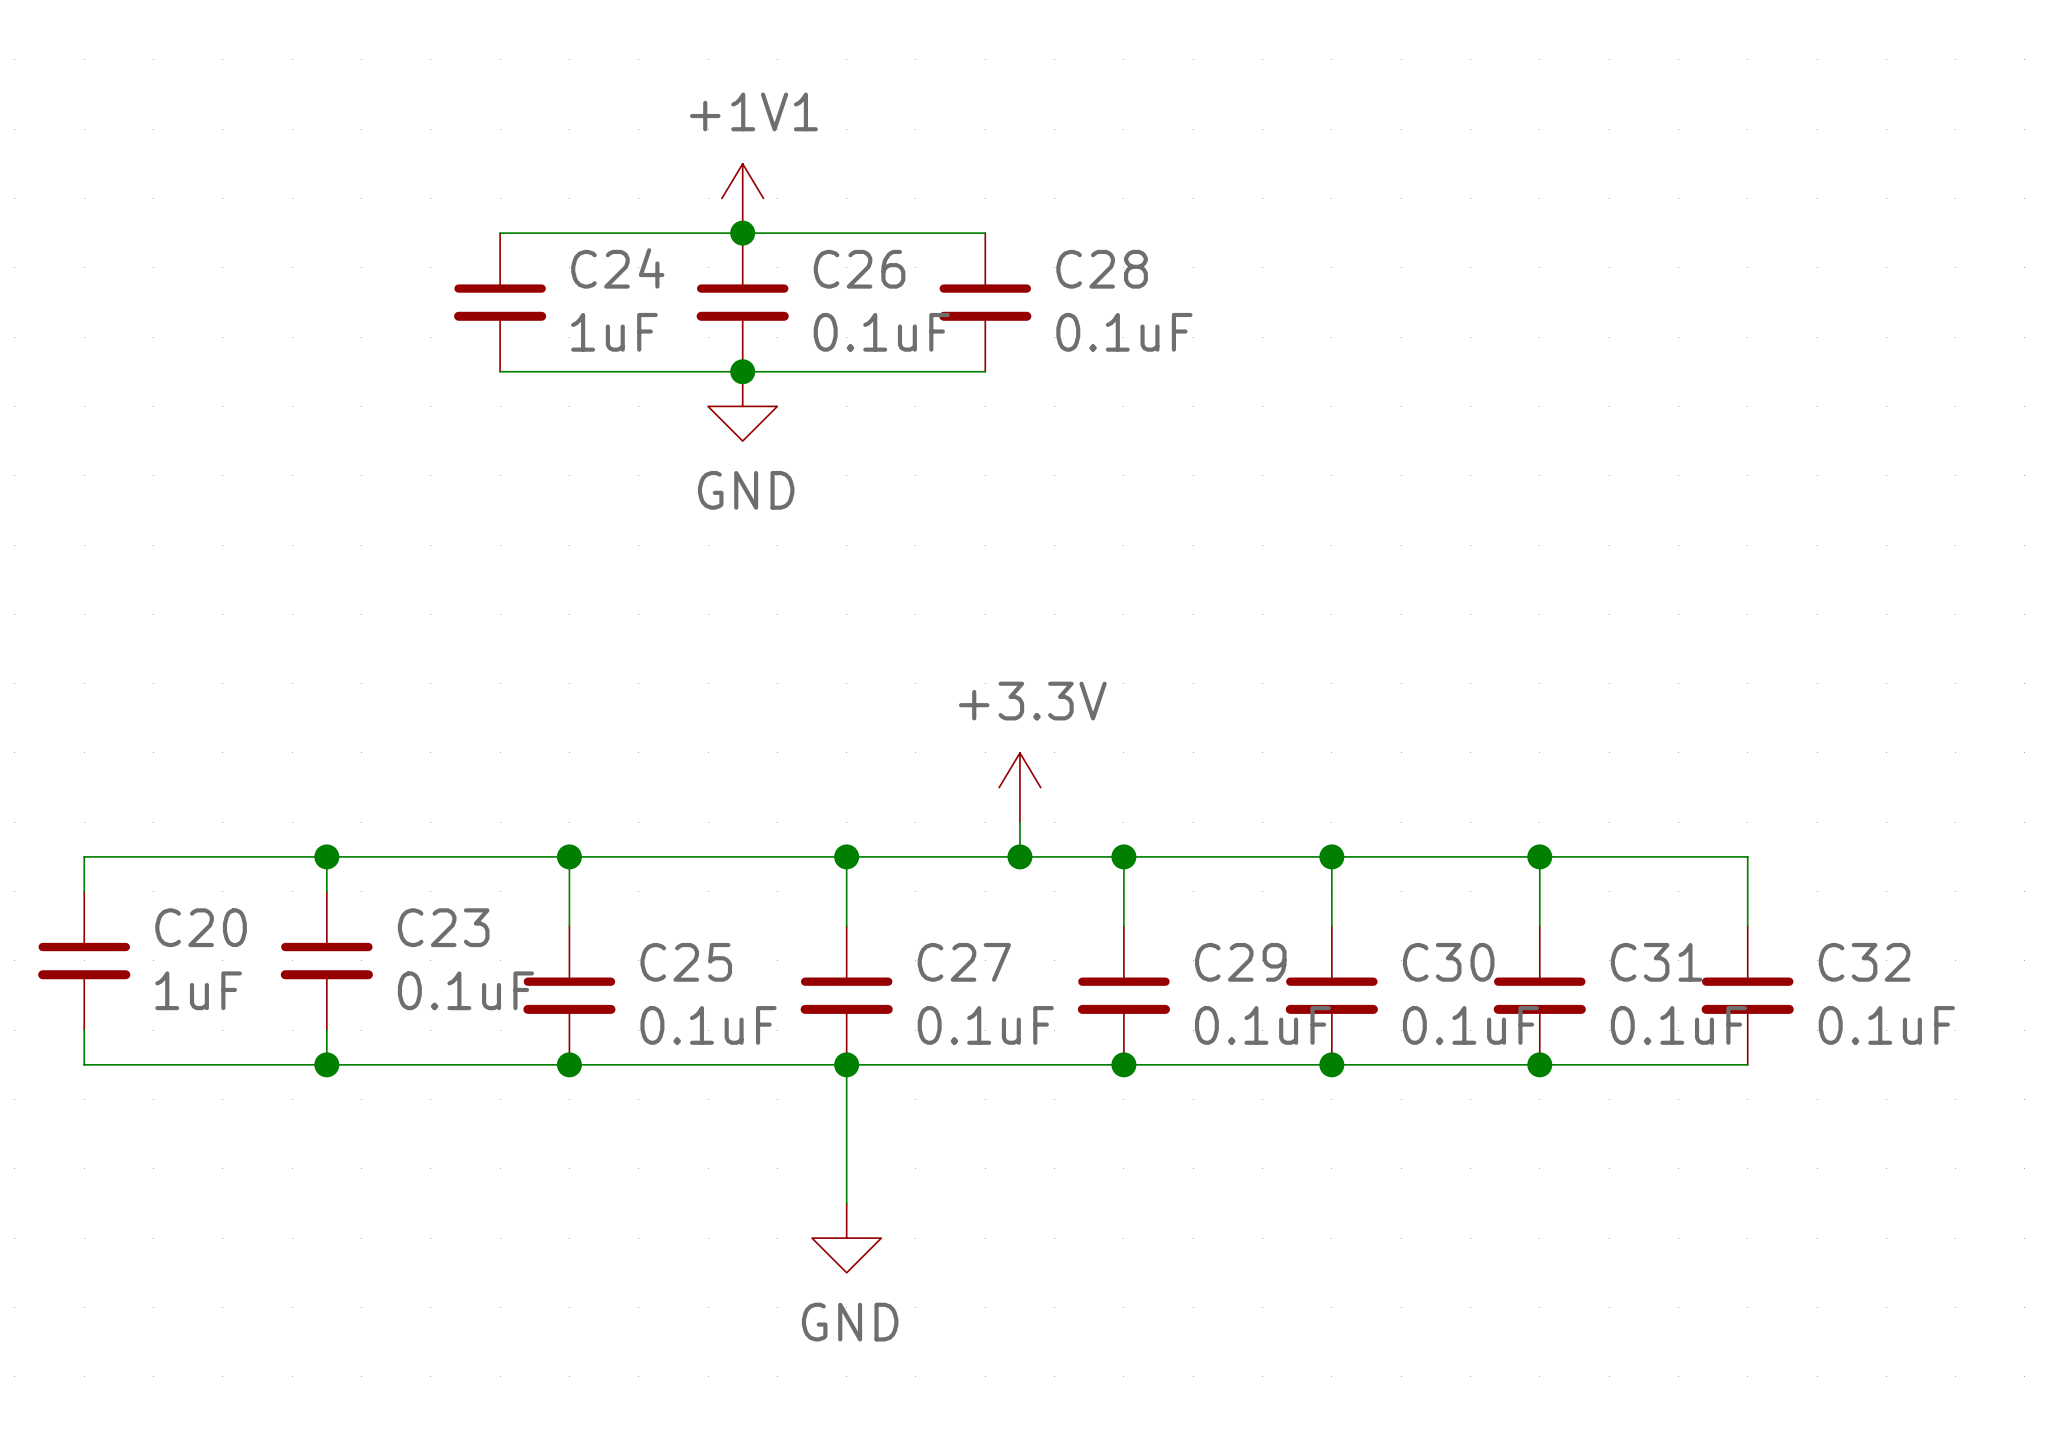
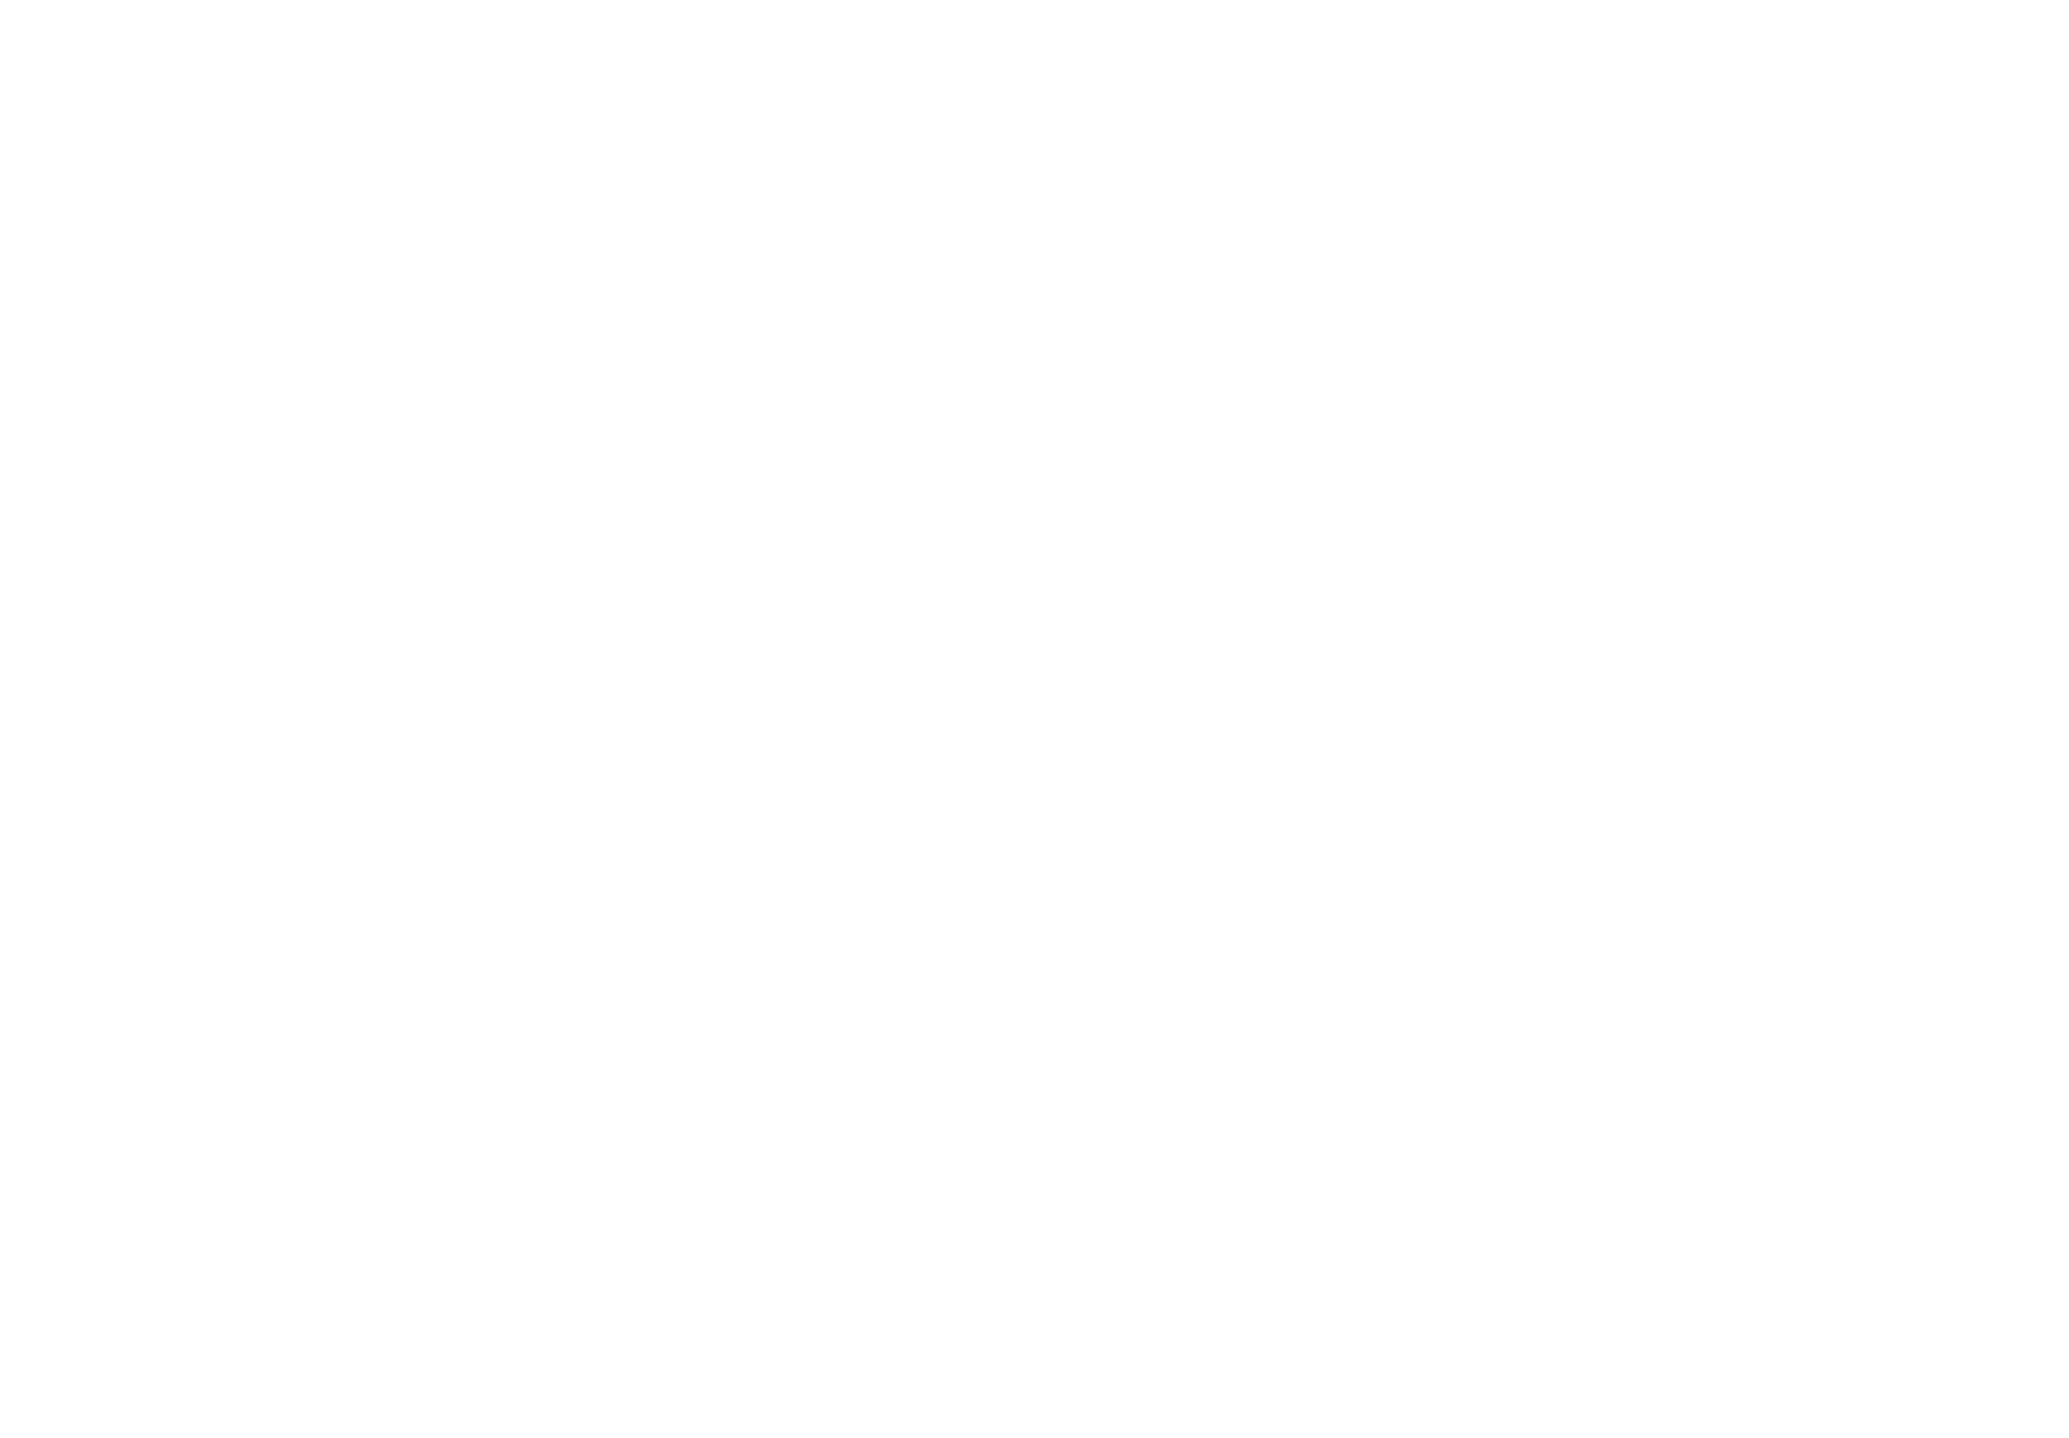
power symbol: +1V1 (742, 198) -> none
wire: (500, 233) (985, 233) -> none
junction: (742, 233) -> none
C24: 1uF (500, 302) -> none
C26: 0.1uF (742, 302) -> none
C28: 0.1uF (985, 302) -> none
wire: (500, 371) (985, 371) -> none
junction: (742, 371) -> none
power symbol: GND (742, 406) -> none
power symbol: +3.3V (1019, 787) -> none
wire: (1019, 822) (1019, 856) -> none
wire: (326, 856) (326, 891) -> none
junction: (326, 856) -> none
wire: (569, 856) (569, 926) -> none
junction: (569, 856) -> none
wire: (846, 856) (846, 926) -> none
junction: (846, 856) -> none
junction: (1019, 856) -> none
wire: (1123, 856) (1123, 926) -> none
junction: (1123, 856) -> none
wire: (1331, 856) (1331, 926) -> none
junction: (1331, 856) -> none
wire: (1539, 856) (1539, 926) -> none
junction: (1539, 856) -> none
wire: (84, 891) (84, 856) (1747, 856) (1747, 926) -> none
C20: 1uF (84, 960) -> none
C23: 0.1uF (326, 960) -> none
C25: 0.1uF (569, 995) -> none
C27: 0.1uF (846, 995) -> none
C29: 0.1uF (1123, 995) -> none
C30: 0.1uF (1331, 995) -> none
C31: 0.1uF (1539, 995) -> none
C32: 0.1uF (1747, 995) -> none
wire: (84, 1030) (84, 1064) (1747, 1064) -> none
wire: (326, 1030) (326, 1064) -> none
junction: (326, 1064) -> none
junction: (569, 1064) -> none
wire: (846, 1064) (846, 1203) -> none
junction: (846, 1064) -> none
junction: (1123, 1064) -> none
junction: (1331, 1064) -> none
junction: (1539, 1064) -> none
power symbol: GND (846, 1238) -> none

